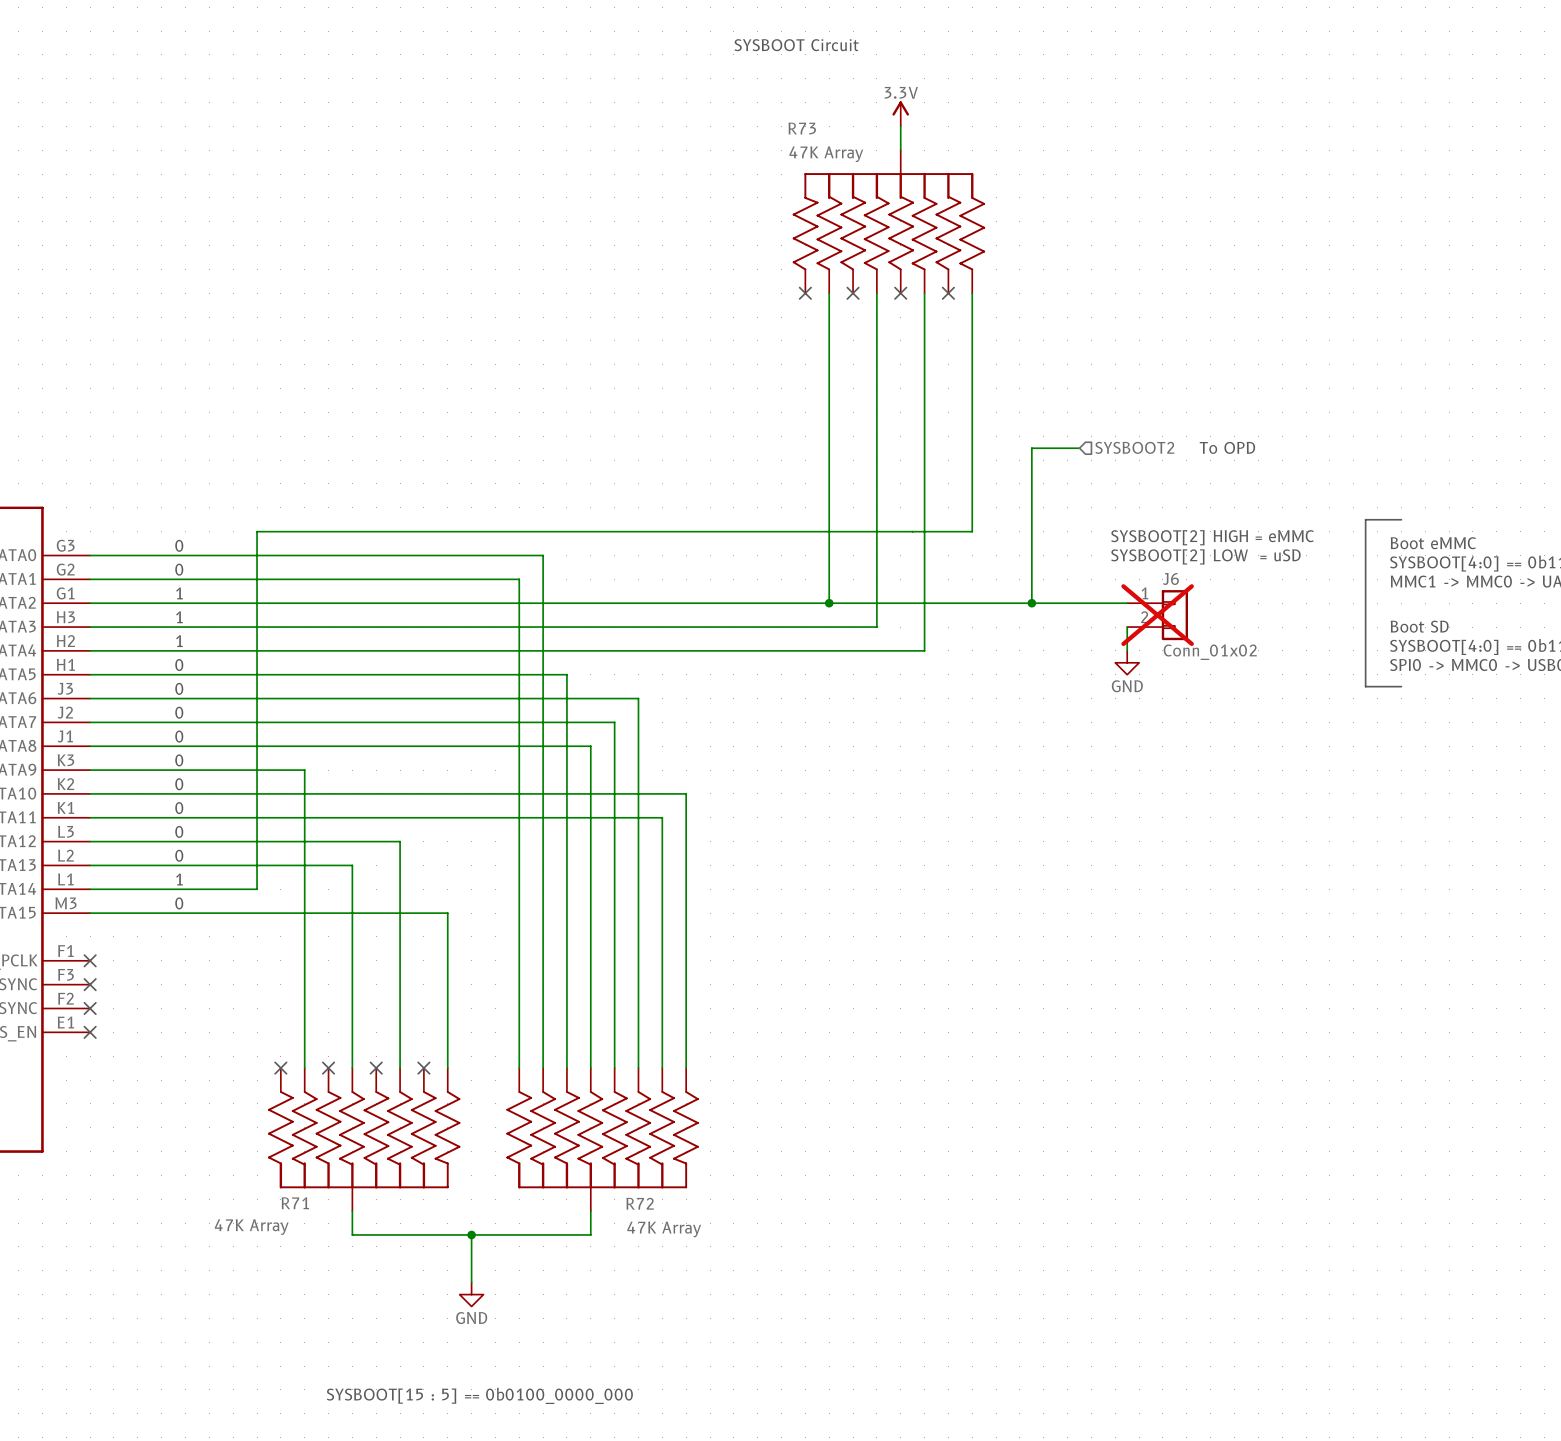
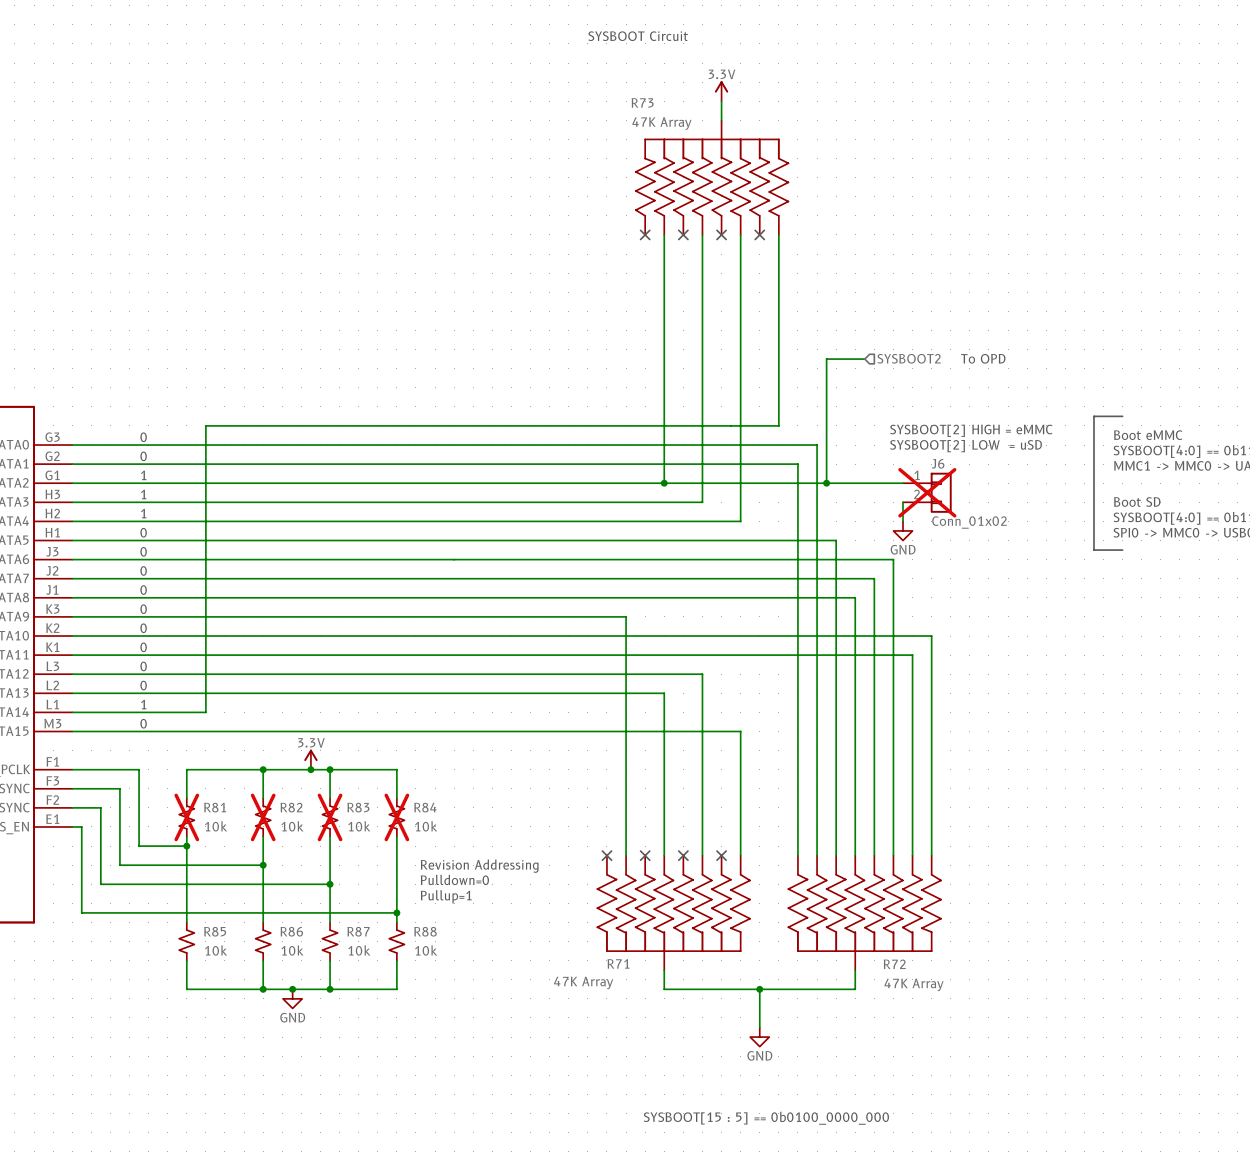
wire: (543, 555) (543, 1068) -> (435, 445) (817, 445) (817, 855)
wire: (519, 579) (519, 1068) -> (415, 464) (797, 464) (797, 855)
wire: (566, 674) (566, 1068) -> (454, 540) (836, 540) (836, 855)
wire: (638, 698) (638, 1068) -> (511, 559) (893, 559) (893, 855)
wire: (614, 722) (614, 1068) -> (492, 578) (874, 578) (874, 855)
wire: (590, 746) (590, 1068) -> (473, 597) (855, 597) (855, 855)
wire: (304, 770) (304, 1068) -> (244, 616) (626, 616) (626, 855)
wire: (686, 793) (686, 1068) -> (549, 636) (931, 636) (931, 855)
wire: (662, 817) (662, 1068) -> (530, 655) (912, 655) (912, 855)
wire: (400, 841) (400, 1068) -> (320, 674) (702, 674) (702, 855)
wire: (352, 865) (352, 1068) -> (282, 693) (664, 693) (664, 855)
wire: (447, 913) (447, 1068) -> (358, 731) (740, 731) (740, 855)
power symbol: none -> 3.3V (310, 759)
wire: none -> (72, 769) (139, 769) (139, 846) (186, 846)
no-connect mark: (90, 960) -> none
wire: none -> (263, 769) (263, 798)
junction: none -> (263, 769)
junction: none -> (310, 769)
wire: none -> (330, 769) (330, 798)
junction: none -> (330, 769)
wire: none -> (72, 788) (119, 788) (119, 865) (263, 865)
no-connect mark: (90, 984) -> none
wire: none -> (186, 798) (186, 769) (396, 769) (396, 798)
wire: none -> (72, 807) (100, 807) (100, 884) (330, 884)
no-connect mark: (90, 1008) -> none
R81: none -> 10k (186, 817)
R82: none -> 10k (263, 817)
R83: none -> 10k (330, 817)
R84: none -> 10k (396, 817)
wire: none -> (72, 826) (81, 826) (81, 912) (396, 912)
no-connect mark: (90, 1032) -> none
wire: none -> (186, 836) (186, 922)
wire: none -> (263, 836) (263, 922)
wire: none -> (330, 836) (330, 922)
wire: none -> (396, 836) (396, 922)
junction: none -> (186, 846)
no-connect mark: (280, 1068) -> none
no-connect mark: (328, 1068) -> none
no-connect mark: (376, 1068) -> none
no-connect mark: (423, 1068) -> none
no-connect mark: none -> (606, 855)
no-connect mark: none -> (645, 855)
no-connect mark: none -> (683, 855)
no-connect mark: none -> (721, 855)
junction: none -> (263, 865)
text: none -> Revision Addressing (479, 866)
text: none -> Pulldown=0 (454, 879)
junction: none -> (330, 884)
text: none -> Pullup=1 (446, 896)
R71 position: (364, 1139) -> (673, 912)
junction: none -> (396, 912)
R72 position: (602, 1139) -> (864, 912)
R85: none -> 10k (186, 941)
R86: none -> 10k (263, 941)
R87: none -> 10k (330, 941)
R88: none -> 10k (396, 941)
wire: none -> (263, 960) (263, 989)
wire: none -> (330, 960) (330, 989)
wire: (352, 1211) (352, 1234) -> (186, 960) (186, 989) (282, 989)
wire: (590, 1211) (590, 1234) (495, 1234) -> (396, 960) (396, 989)
wire: none -> (664, 970) (664, 989) (855, 989) (855, 970)
junction: none -> (263, 989)
junction: none -> (292, 989)
junction: none -> (330, 989)
wire: (471, 1234) (471, 1282) -> none
junction: (471, 1234) -> none
wire: none -> (759, 989) (759, 1027)
junction: none -> (759, 989)
power symbol position: GND (471, 1294) -> GND (292, 998)
power symbol: none -> GND (759, 1037)
text: SYSBOOT[15 : 5] == 0b0100_0000_000 (479, 1395) -> none
text: none -> SYSBOOT[15 : 5] == 0b0100_0000_000 (766, 1118)

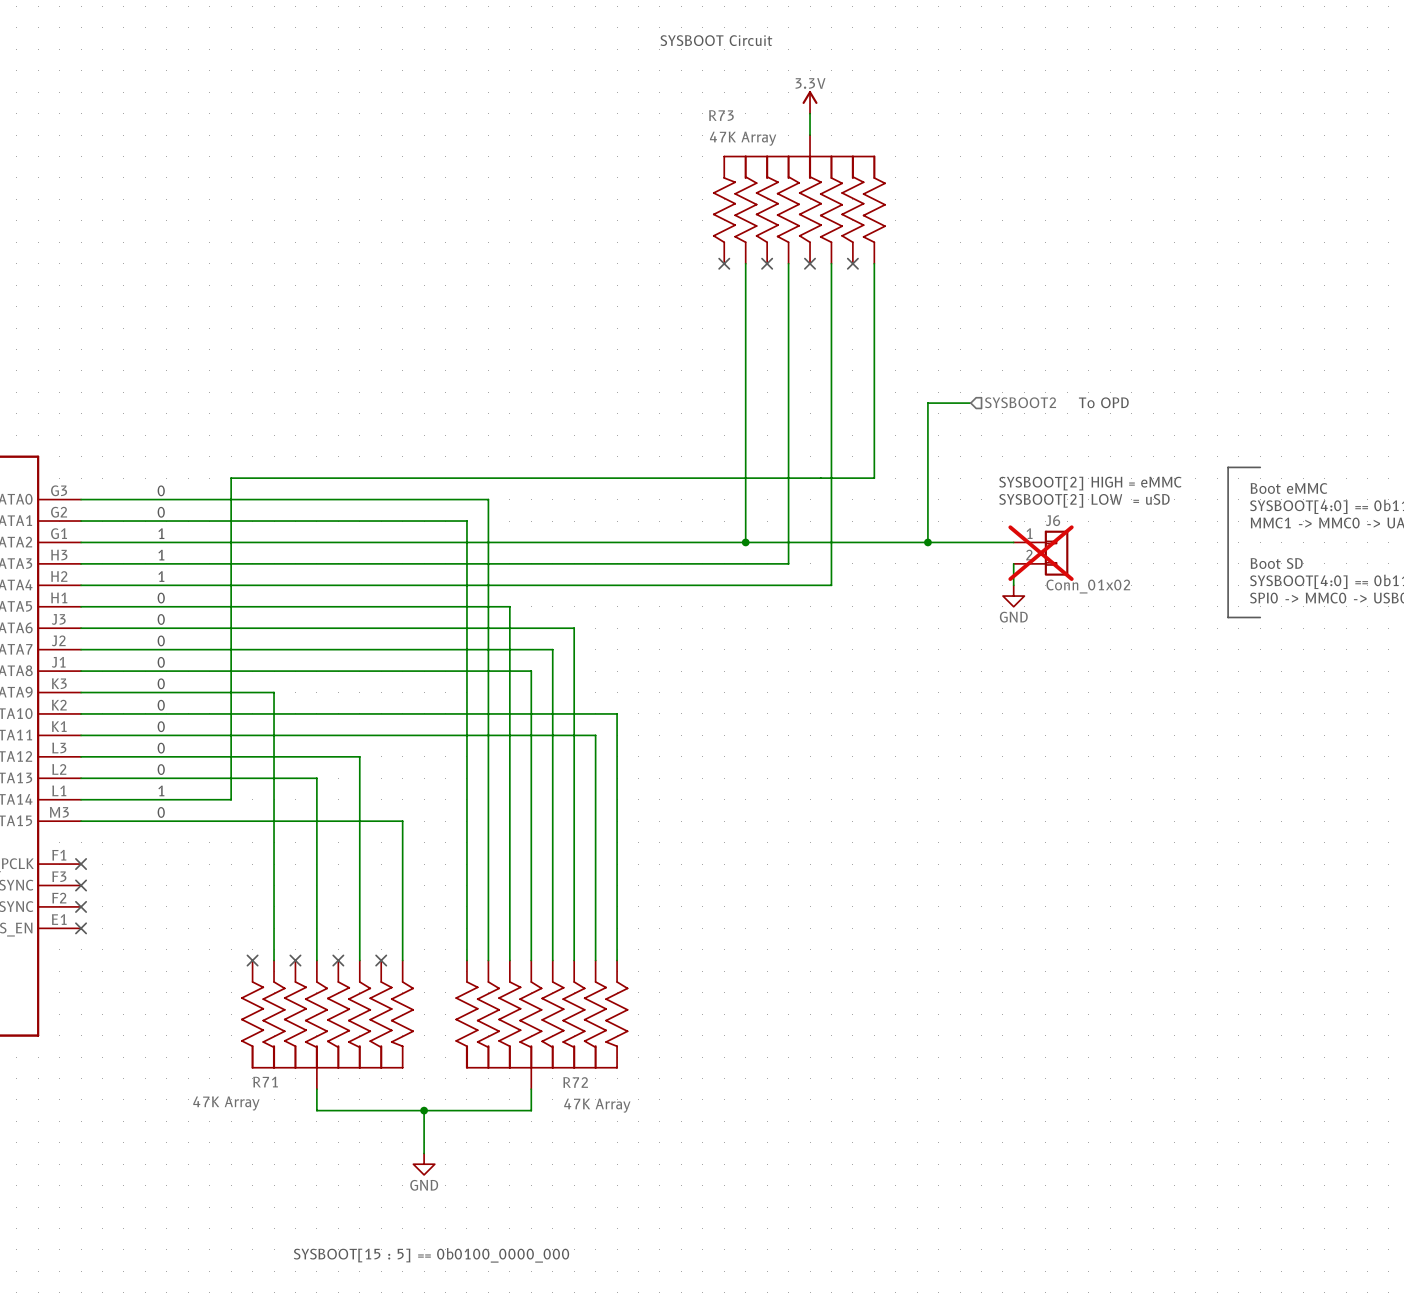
wire: (435, 445) (817, 445) (817, 855) -> (488, 499) (488, 960)
wire: (415, 464) (797, 464) (797, 855) -> (466, 521) (466, 960)
wire: (454, 540) (836, 540) (836, 855) -> (509, 606) (509, 960)
wire: (511, 559) (893, 559) (893, 855) -> (574, 628) (574, 960)
wire: (492, 578) (874, 578) (874, 855) -> (552, 649) (552, 960)
wire: (473, 597) (855, 597) (855, 855) -> (531, 671) (531, 960)
wire: (244, 616) (626, 616) (626, 855) -> (274, 692) (274, 960)
wire: (549, 636) (931, 636) (931, 855) -> (617, 713) (617, 960)
wire: (530, 655) (912, 655) (912, 855) -> (595, 735) (595, 960)
wire: (320, 674) (702, 674) (702, 855) -> (359, 756) (359, 960)
wire: (282, 693) (664, 693) (664, 855) -> (316, 778) (316, 960)
wire: (358, 731) (740, 731) (740, 855) -> (402, 821) (402, 960)
power symbol: 3.3V (310, 759) -> none
wire: (72, 769) (139, 769) (139, 846) (186, 846) -> none
no-connect mark: none -> (81, 864)
wire: (263, 769) (263, 798) -> none
junction: (263, 769) -> none
junction: (310, 769) -> none
wire: (330, 769) (330, 798) -> none
junction: (330, 769) -> none
wire: (72, 788) (119, 788) (119, 865) (263, 865) -> none
no-connect mark: none -> (81, 885)
wire: (186, 798) (186, 769) (396, 769) (396, 798) -> none
wire: (72, 807) (100, 807) (100, 884) (330, 884) -> none
no-connect mark: none -> (81, 906)
R81: 10k (186, 817) -> none
R82: 10k (263, 817) -> none
R83: 10k (330, 817) -> none
R84: 10k (396, 817) -> none
wire: (72, 826) (81, 826) (81, 912) (396, 912) -> none
no-connect mark: none -> (81, 928)
wire: (186, 836) (186, 922) -> none
wire: (263, 836) (263, 922) -> none
wire: (330, 836) (330, 922) -> none
wire: (396, 836) (396, 922) -> none
junction: (186, 846) -> none
no-connect mark: none -> (252, 960)
no-connect mark: none -> (295, 960)
no-connect mark: none -> (338, 960)
no-connect mark: none -> (381, 960)
no-connect mark: (606, 855) -> none
no-connect mark: (645, 855) -> none
no-connect mark: (683, 855) -> none
no-connect mark: (721, 855) -> none
junction: (263, 865) -> none
text: Revision Addressing (479, 866) -> none
text: Pulldown=0 (454, 879) -> none
junction: (330, 884) -> none
text: Pullup=1 (446, 896) -> none
junction: (396, 912) -> none
R71 position: (673, 912) -> (327, 1024)
R72 position: (864, 912) -> (541, 1024)
R85: 10k (186, 941) -> none
R86: 10k (263, 941) -> none
R87: 10k (330, 941) -> none
R88: 10k (396, 941) -> none
wire: (186, 960) (186, 989) (282, 989) -> (316, 1089) (316, 1110)
wire: (263, 960) (263, 989) -> none
wire: (330, 960) (330, 989) -> none
wire: (396, 960) (396, 989) -> (531, 1089) (531, 1110) (445, 1110)
wire: (664, 970) (664, 989) (855, 989) (855, 970) -> none
junction: (263, 989) -> none
junction: (292, 989) -> none
junction: (330, 989) -> none
wire: none -> (424, 1110) (424, 1153)
junction: none -> (424, 1110)
wire: (759, 989) (759, 1027) -> none
junction: (759, 989) -> none
power symbol position: GND (292, 998) -> GND (424, 1164)
power symbol: GND (759, 1037) -> none
text: none -> SYSBOOT[15 : 5] == 0b0100_0000_000 (431, 1255)
text: SYSBOOT[15 : 5] == 0b0100_0000_000 (766, 1118) -> none

